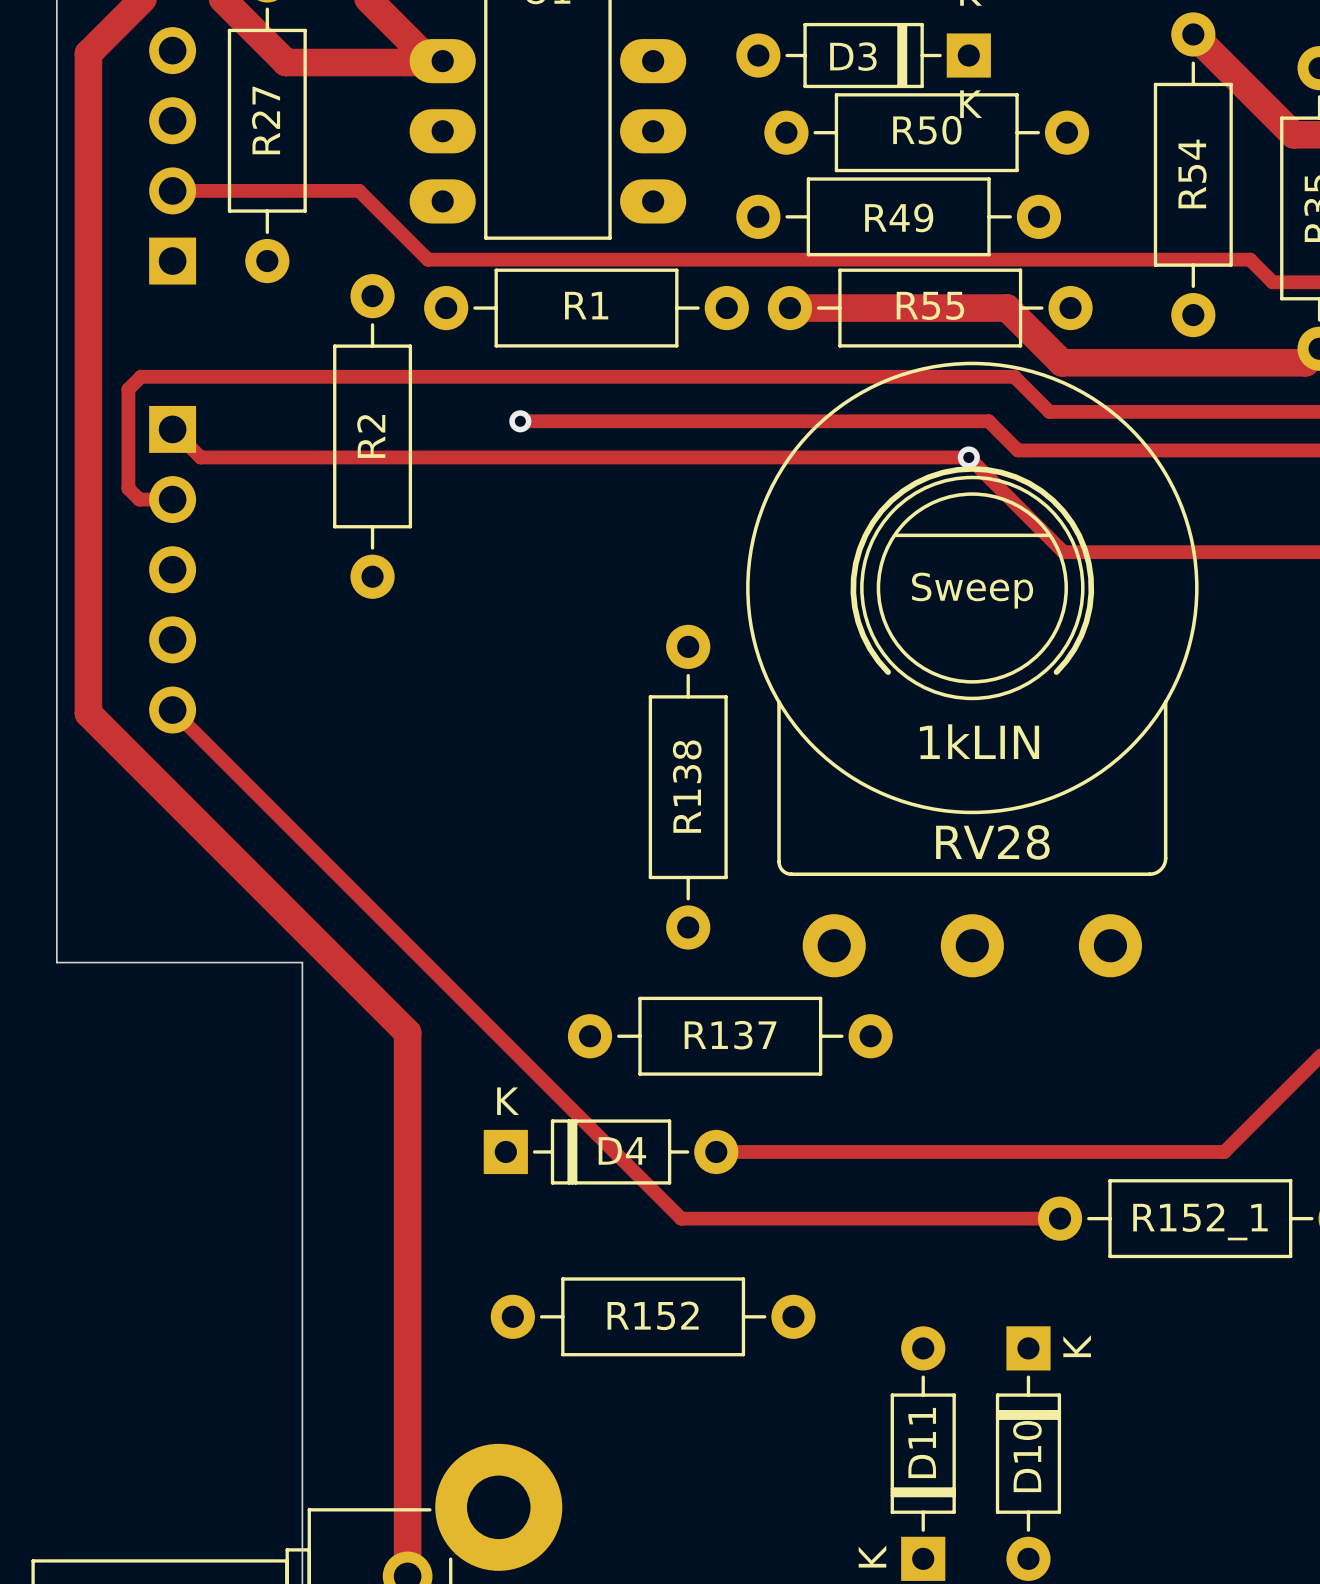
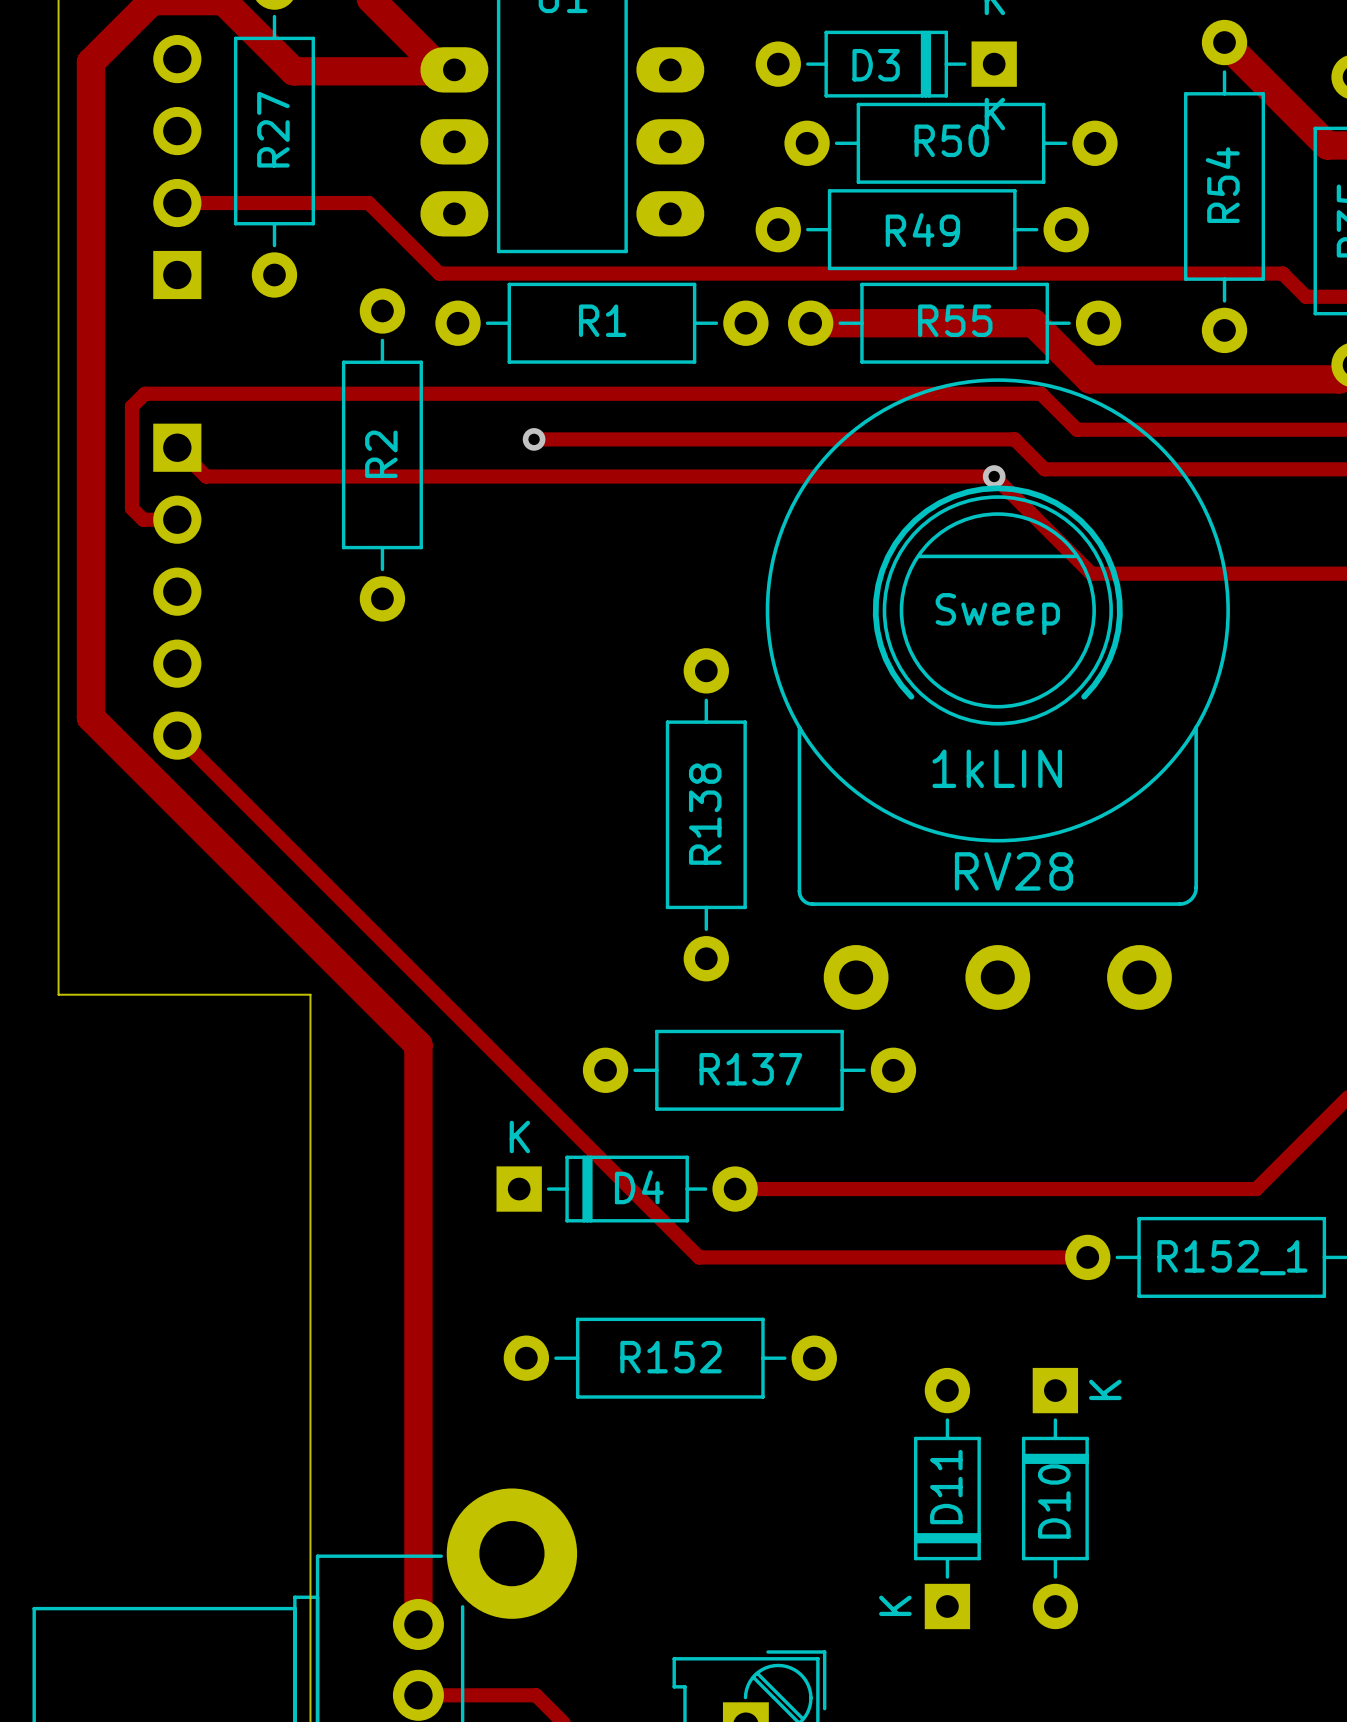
track: (88, 692) (88, 713) (407, 1032) -> (90, 717) (418, 1045) (418, 1066)

